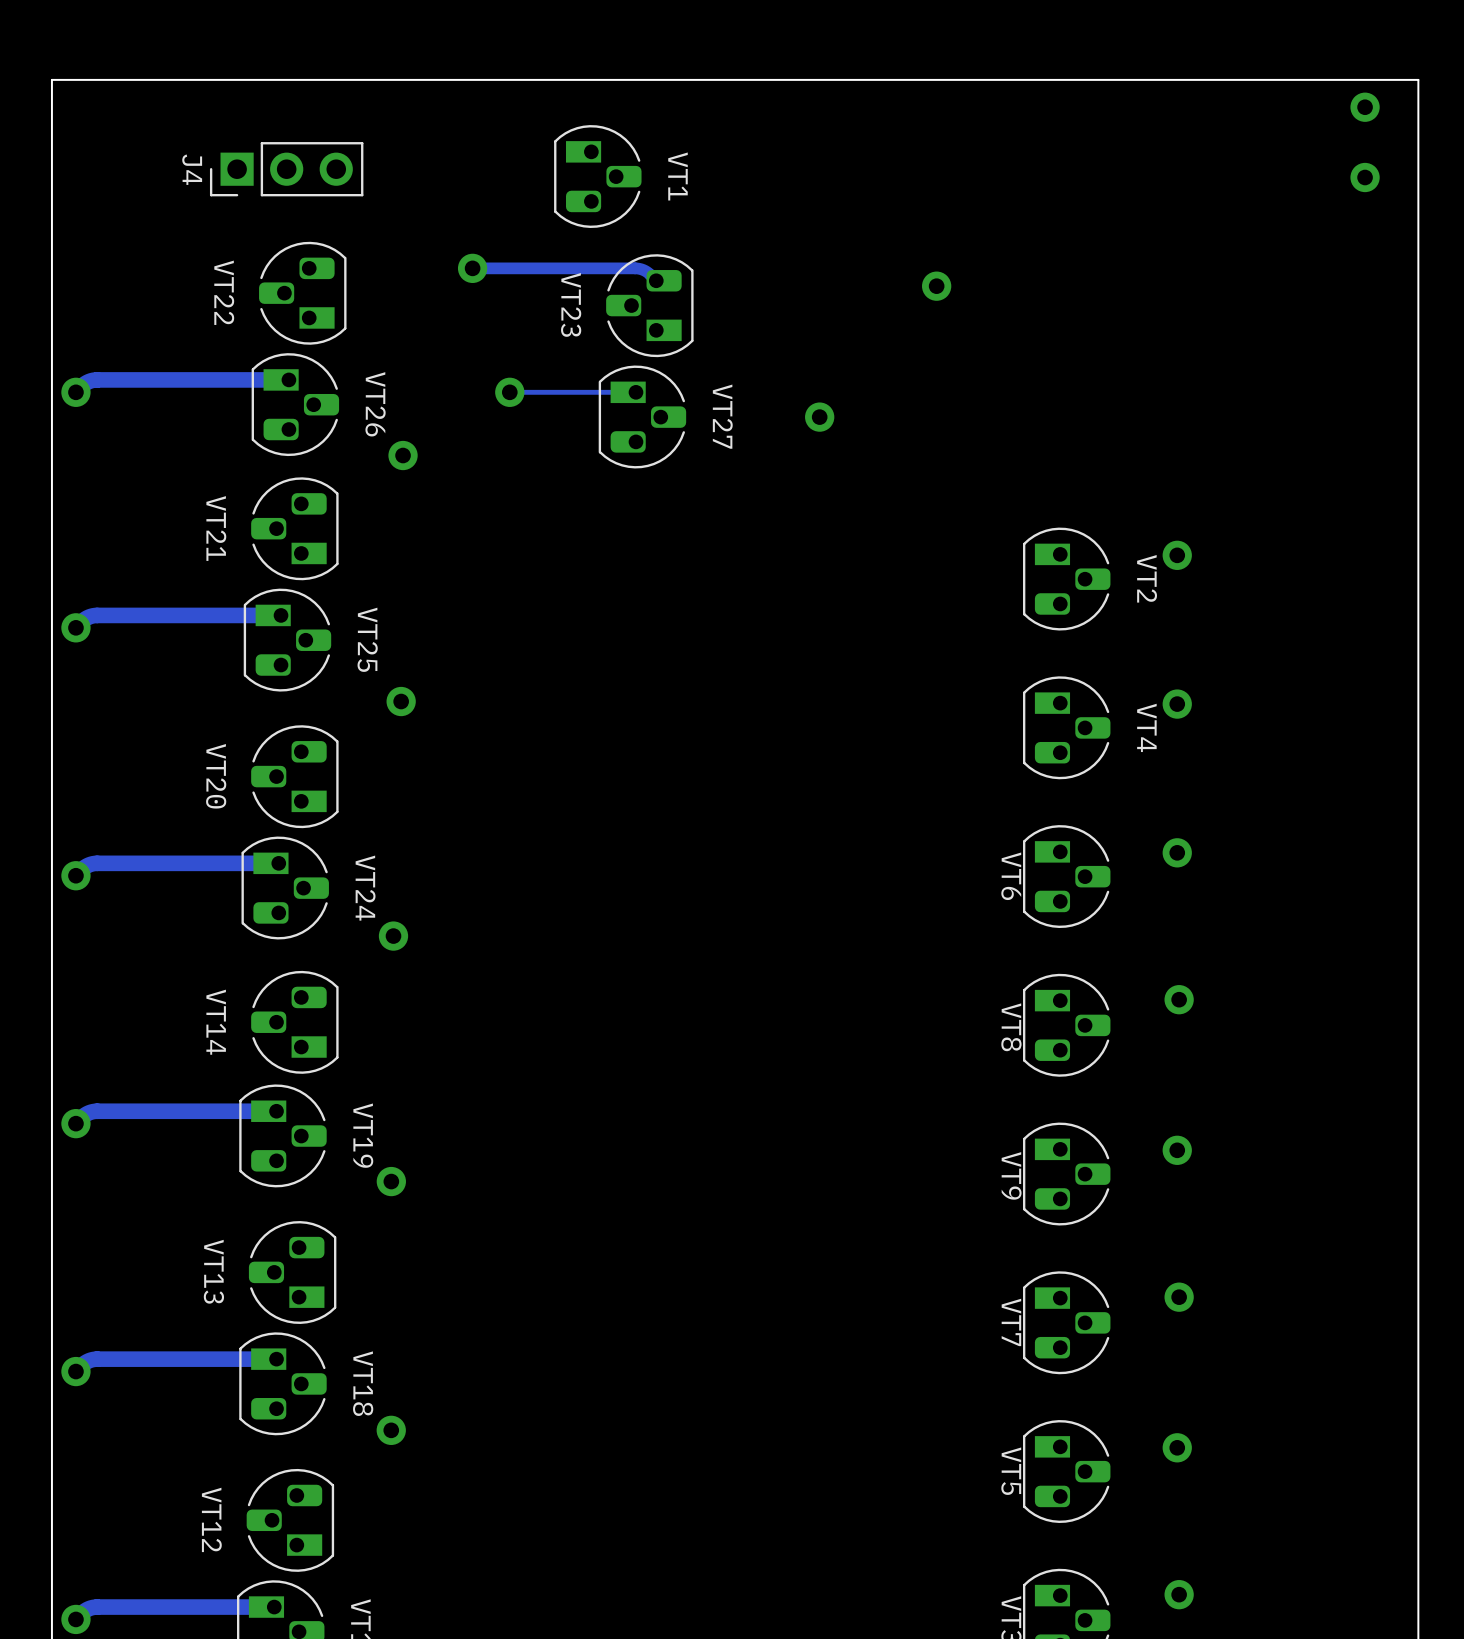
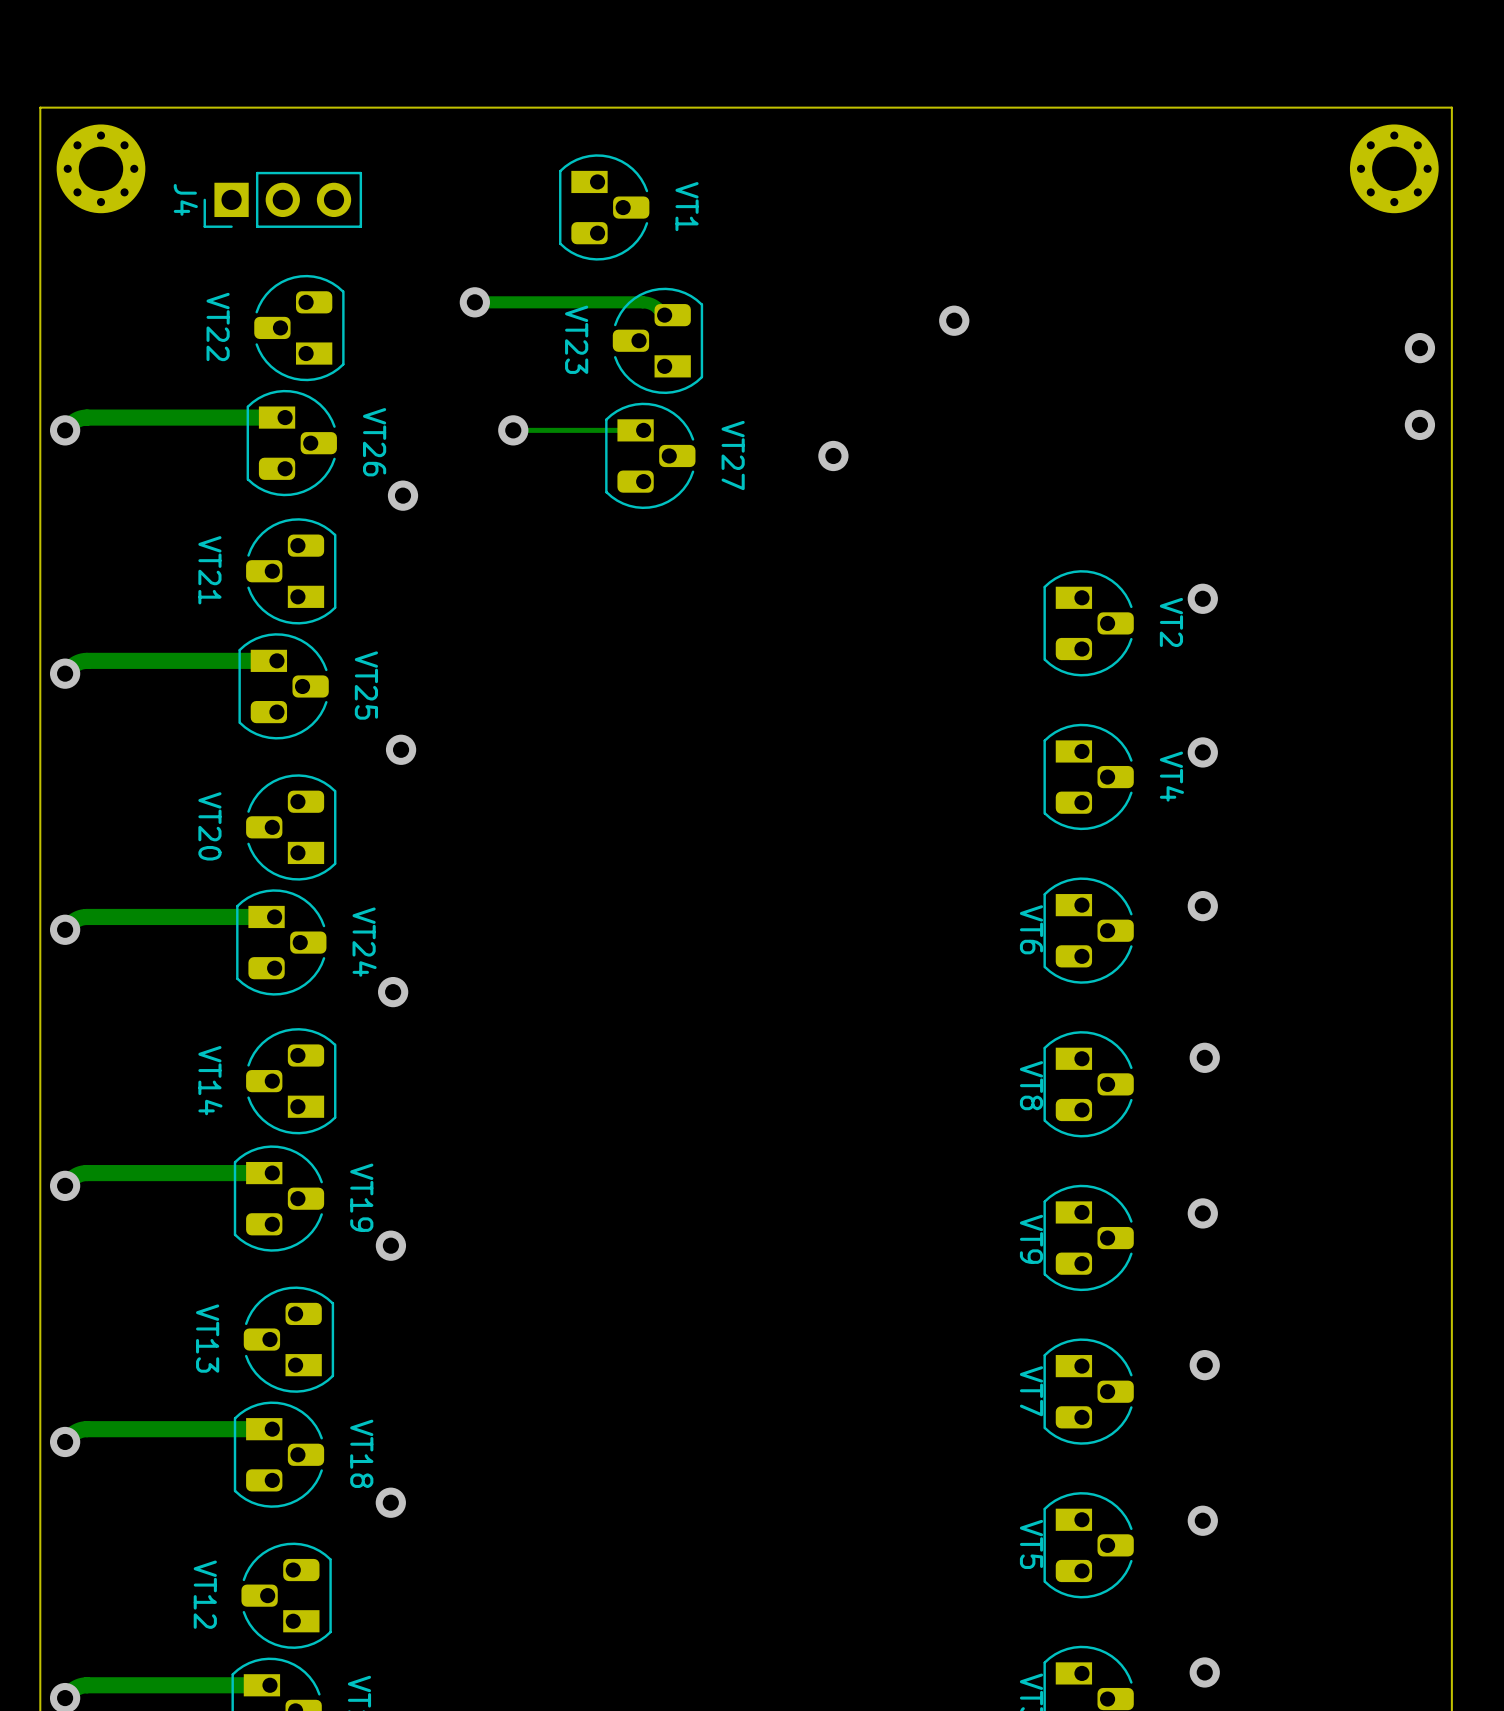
via: (1365, 107) -> none
part: none -> (101, 168)
part: none -> (1394, 168)
via: (1365, 177) -> none
via: none -> (1419, 348)
via: none -> (1419, 424)

